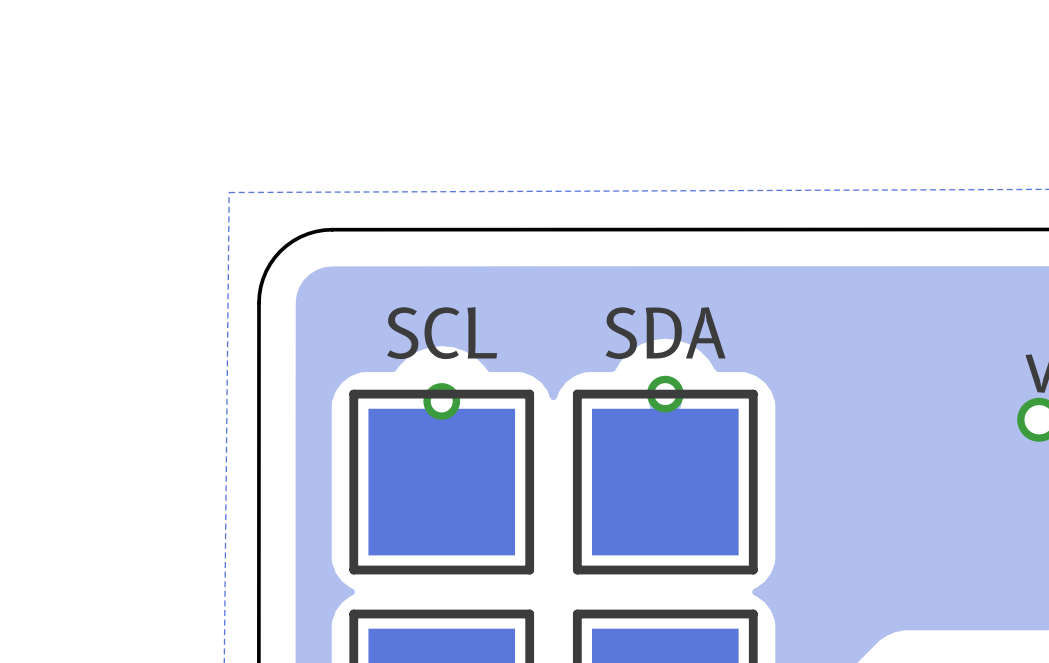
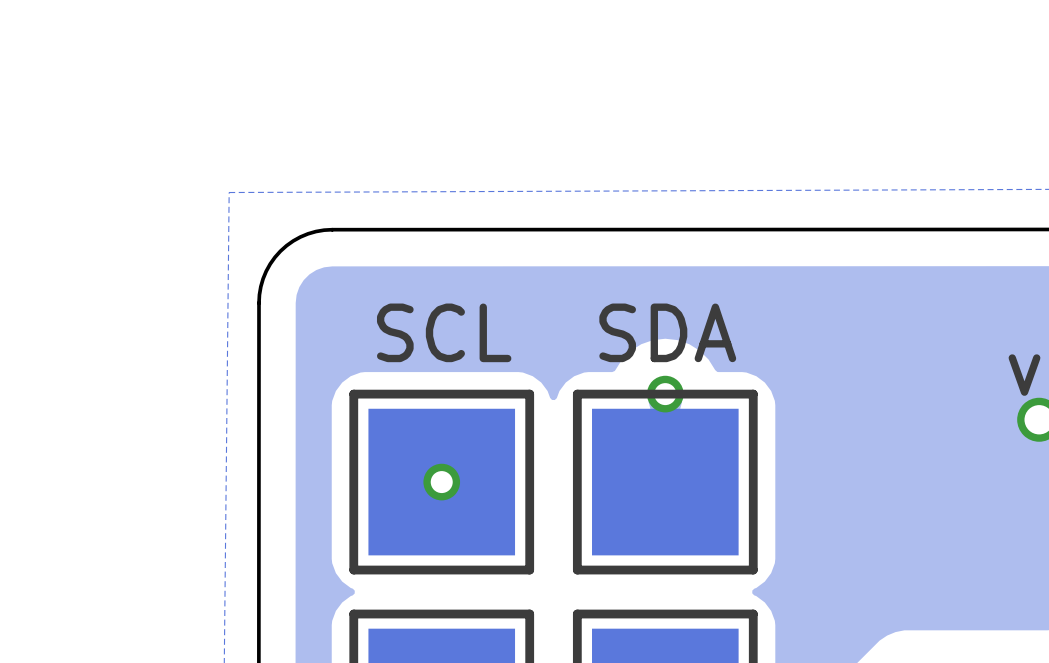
via position: (441, 401) -> (441, 482)

